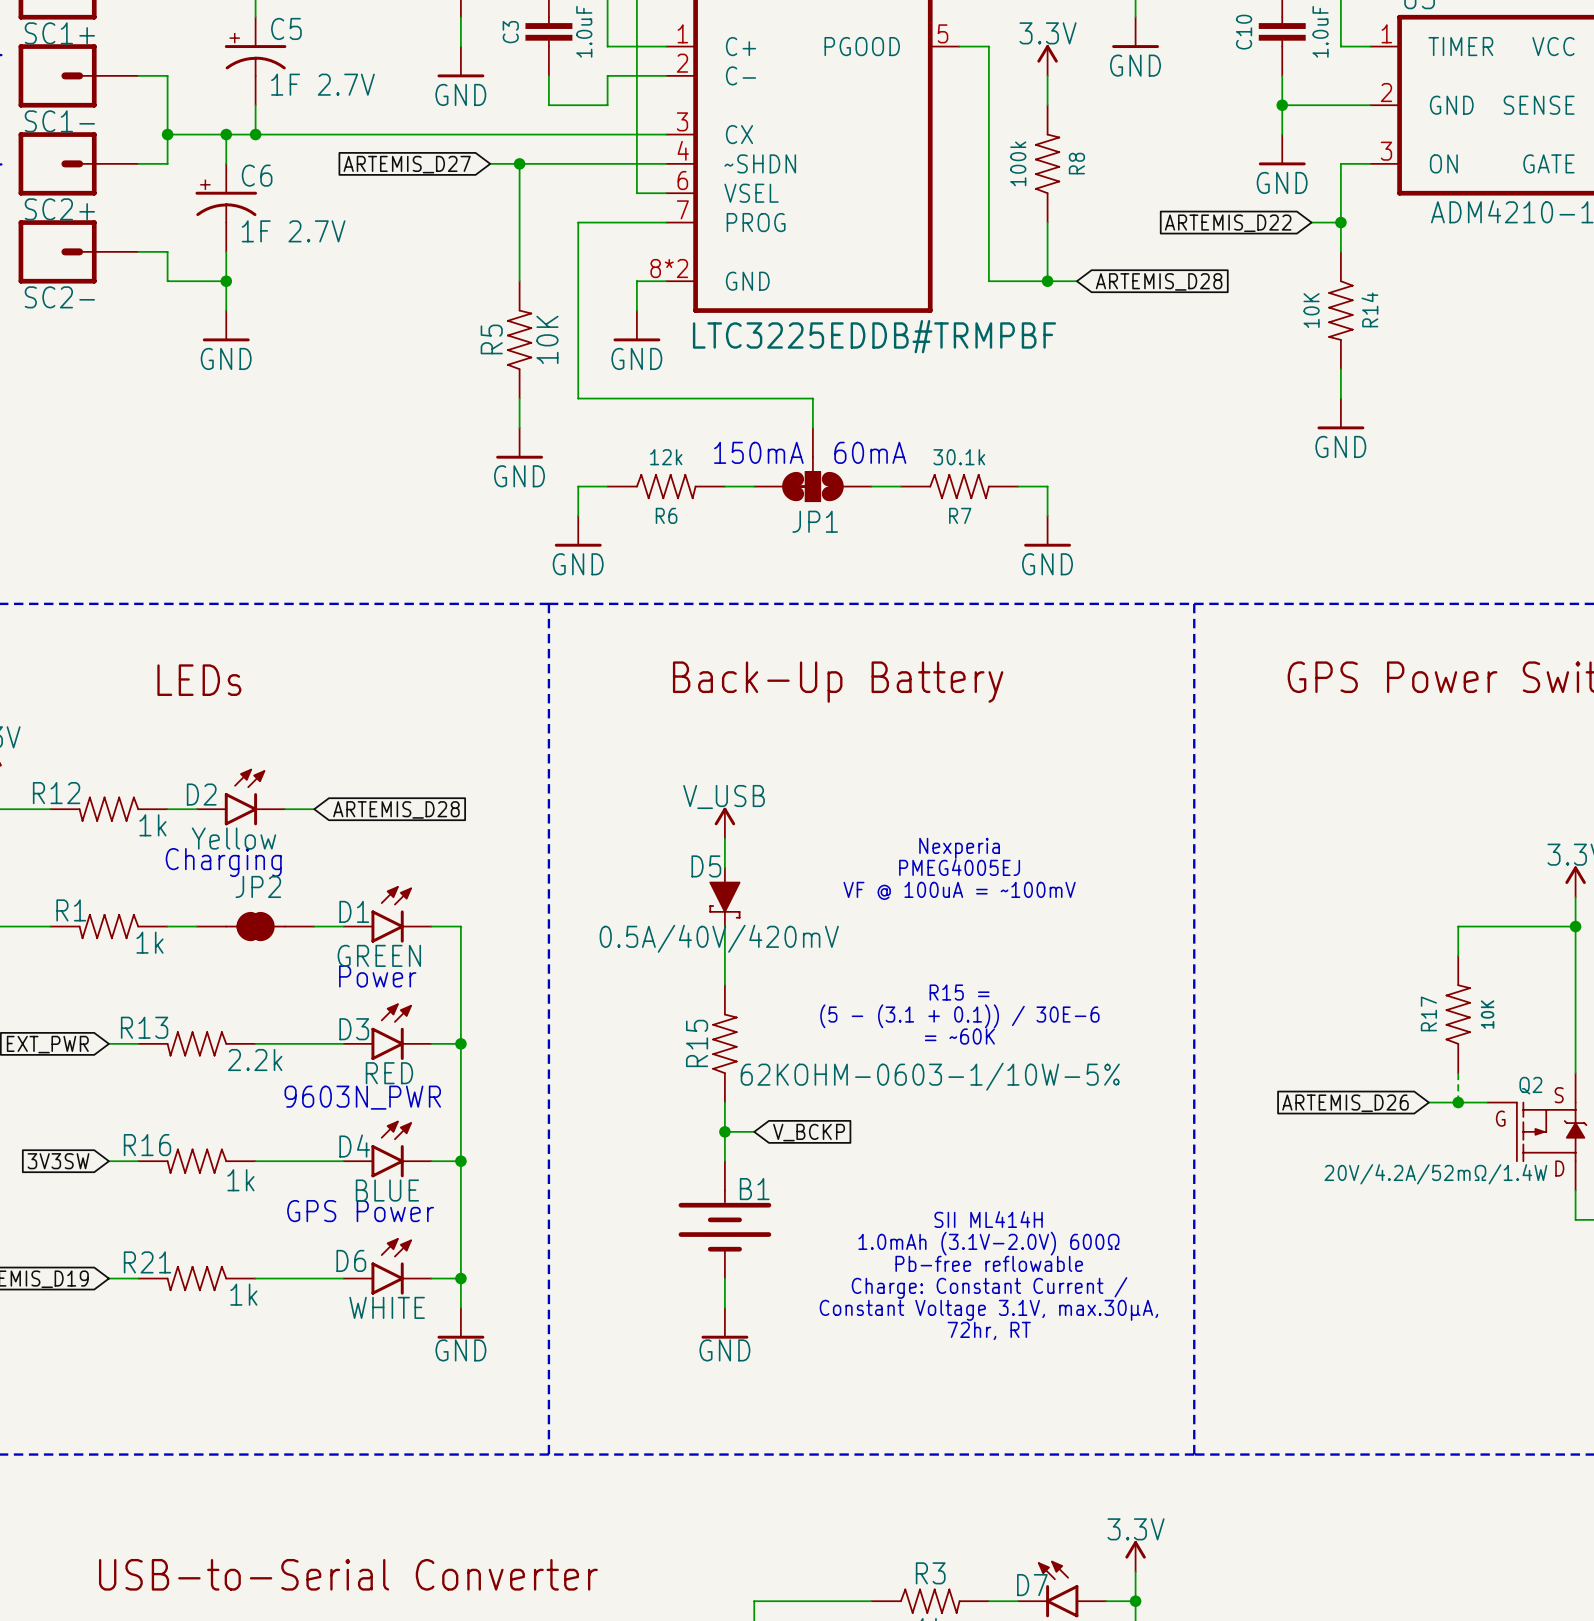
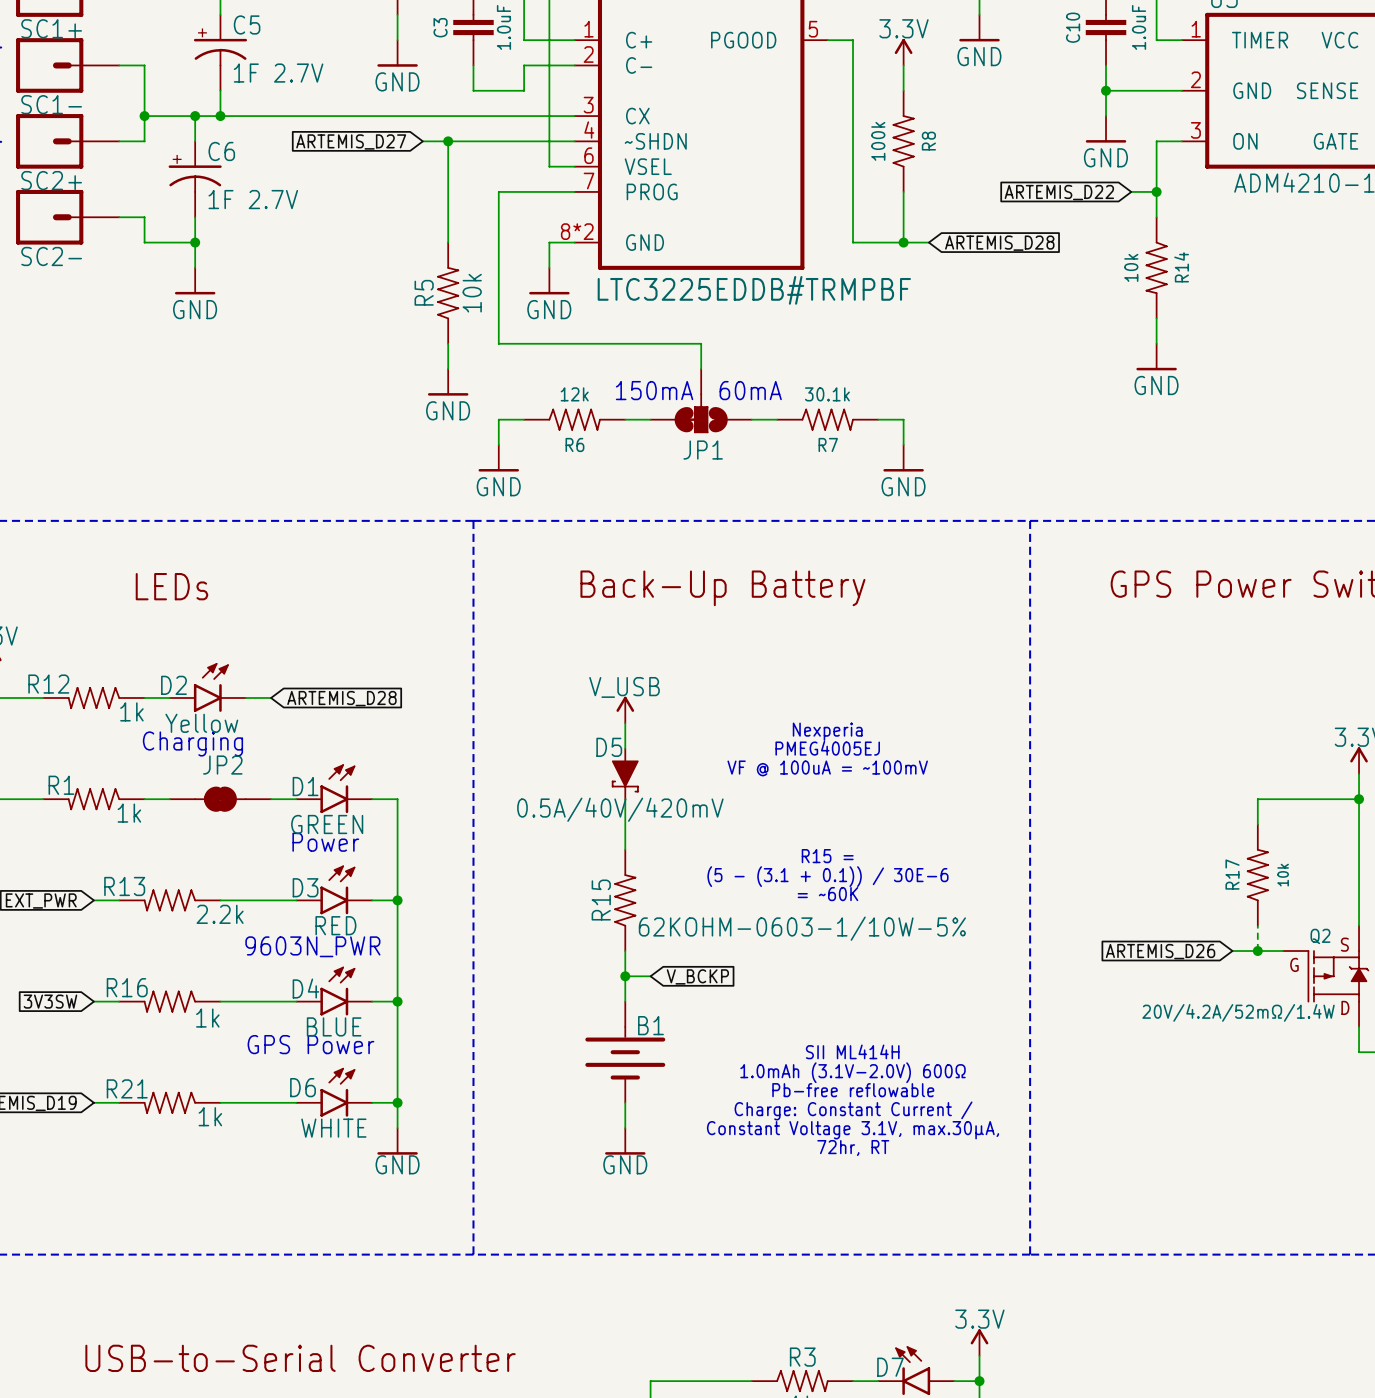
R14 value: 10K (1311, 310) -> 10k (1131, 267)
R5 value: 10K (547, 339) -> 10k (472, 293)
R17 value: 10K (1487, 1014) -> 10k (1283, 875)

